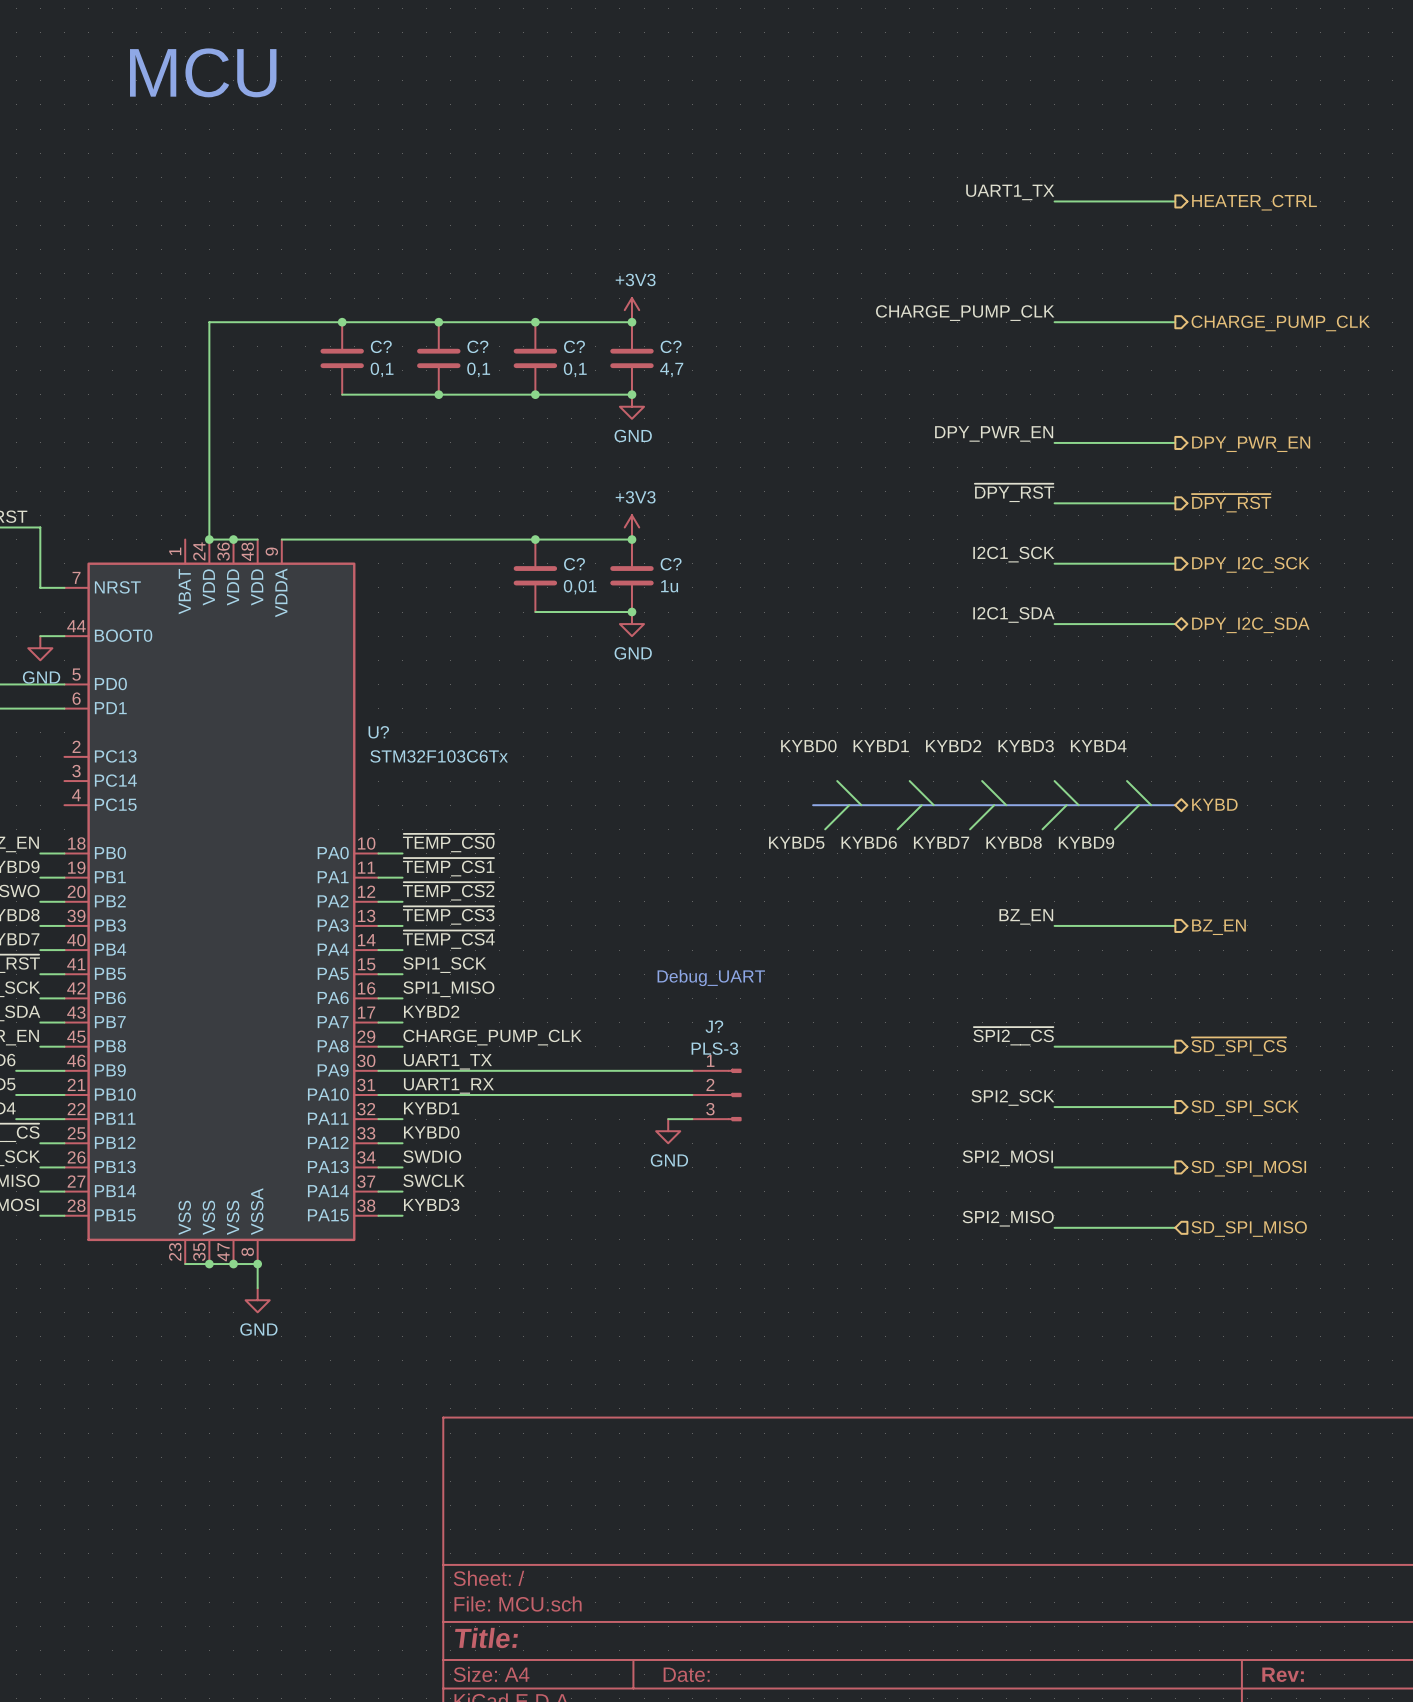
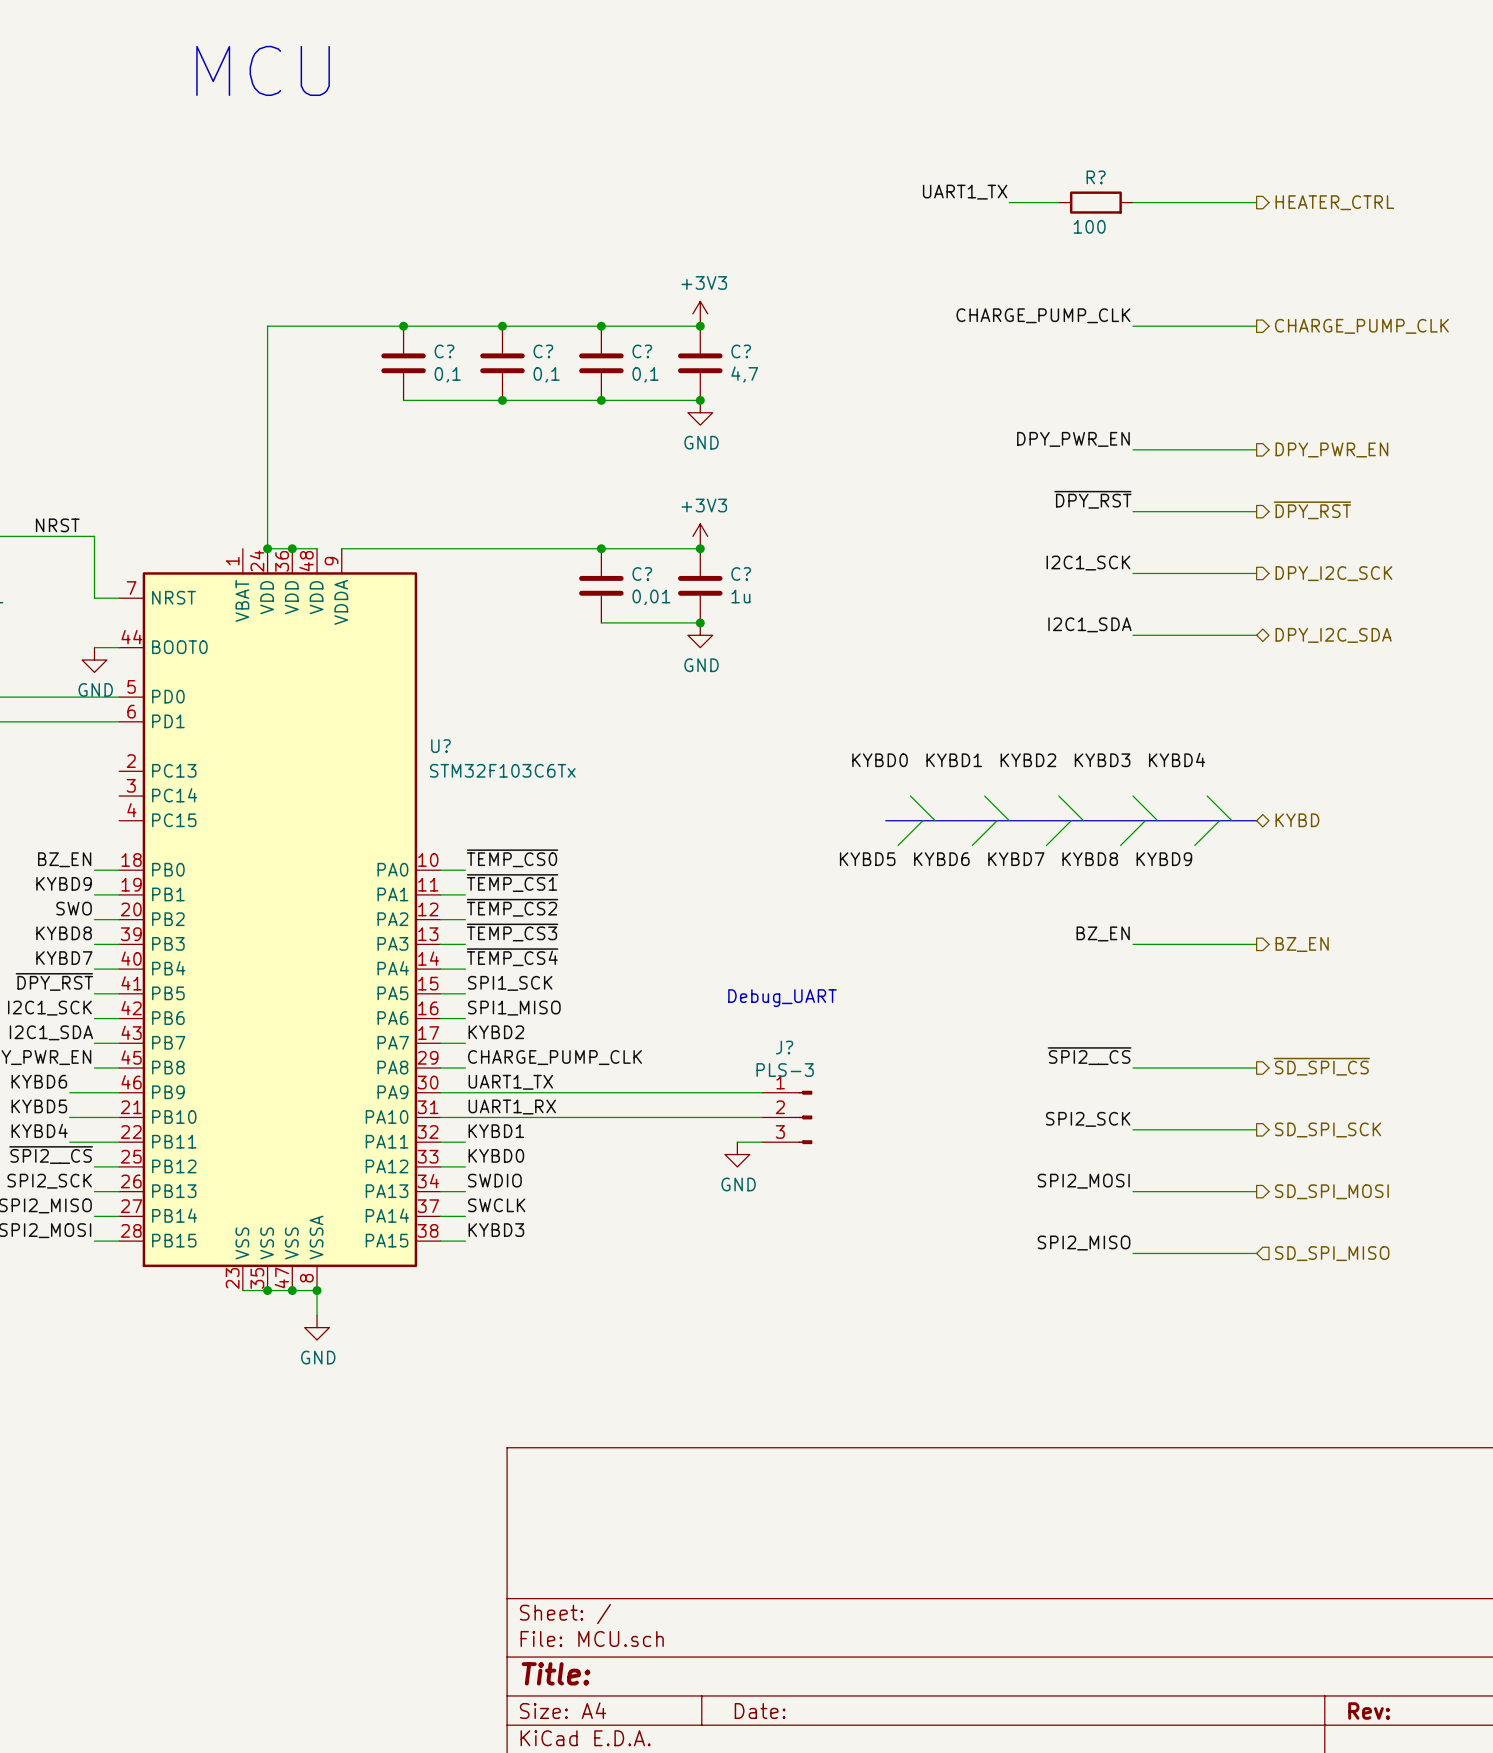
label position: UART1_TX (1010, 192) -> UART1_TX (965, 192)
wire: none -> (1009, 202) (1058, 202)
R?: none -> 100 (1095, 202)

